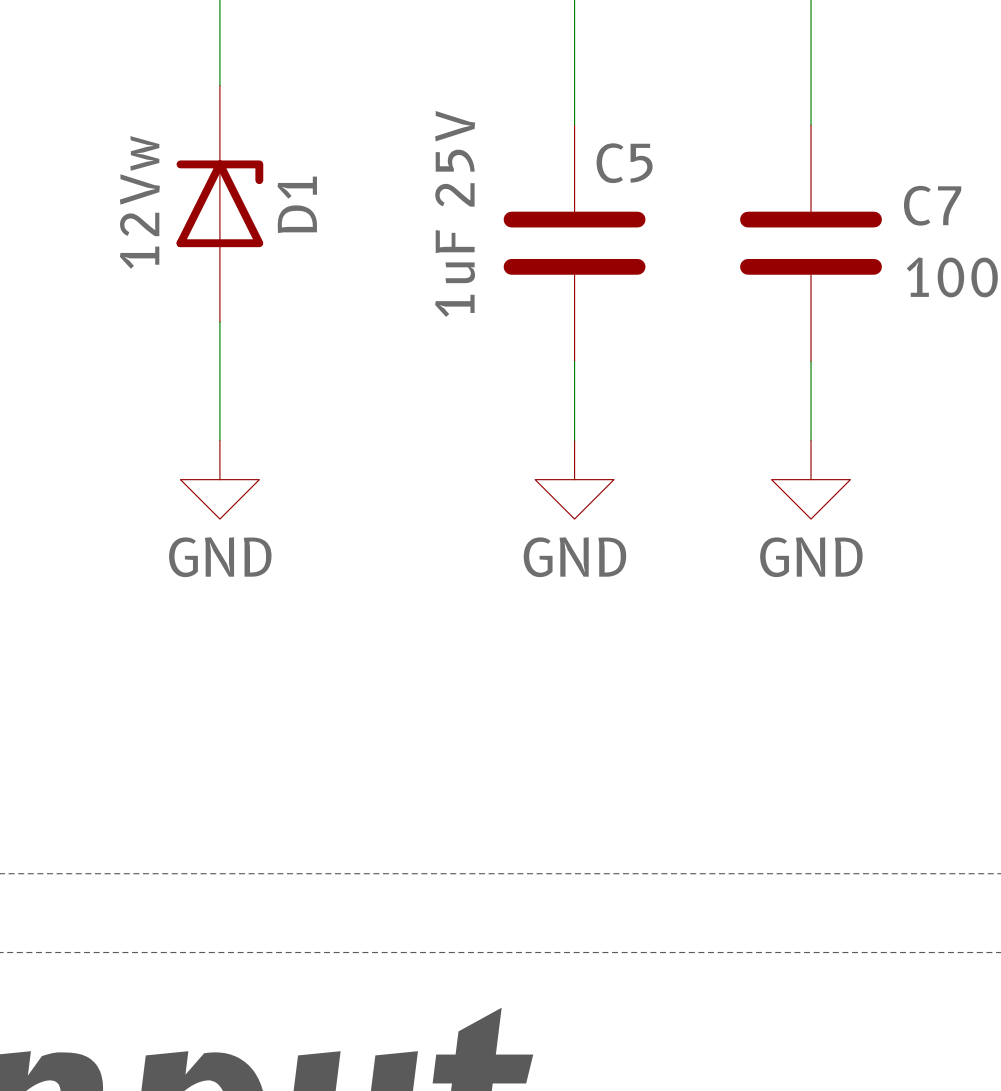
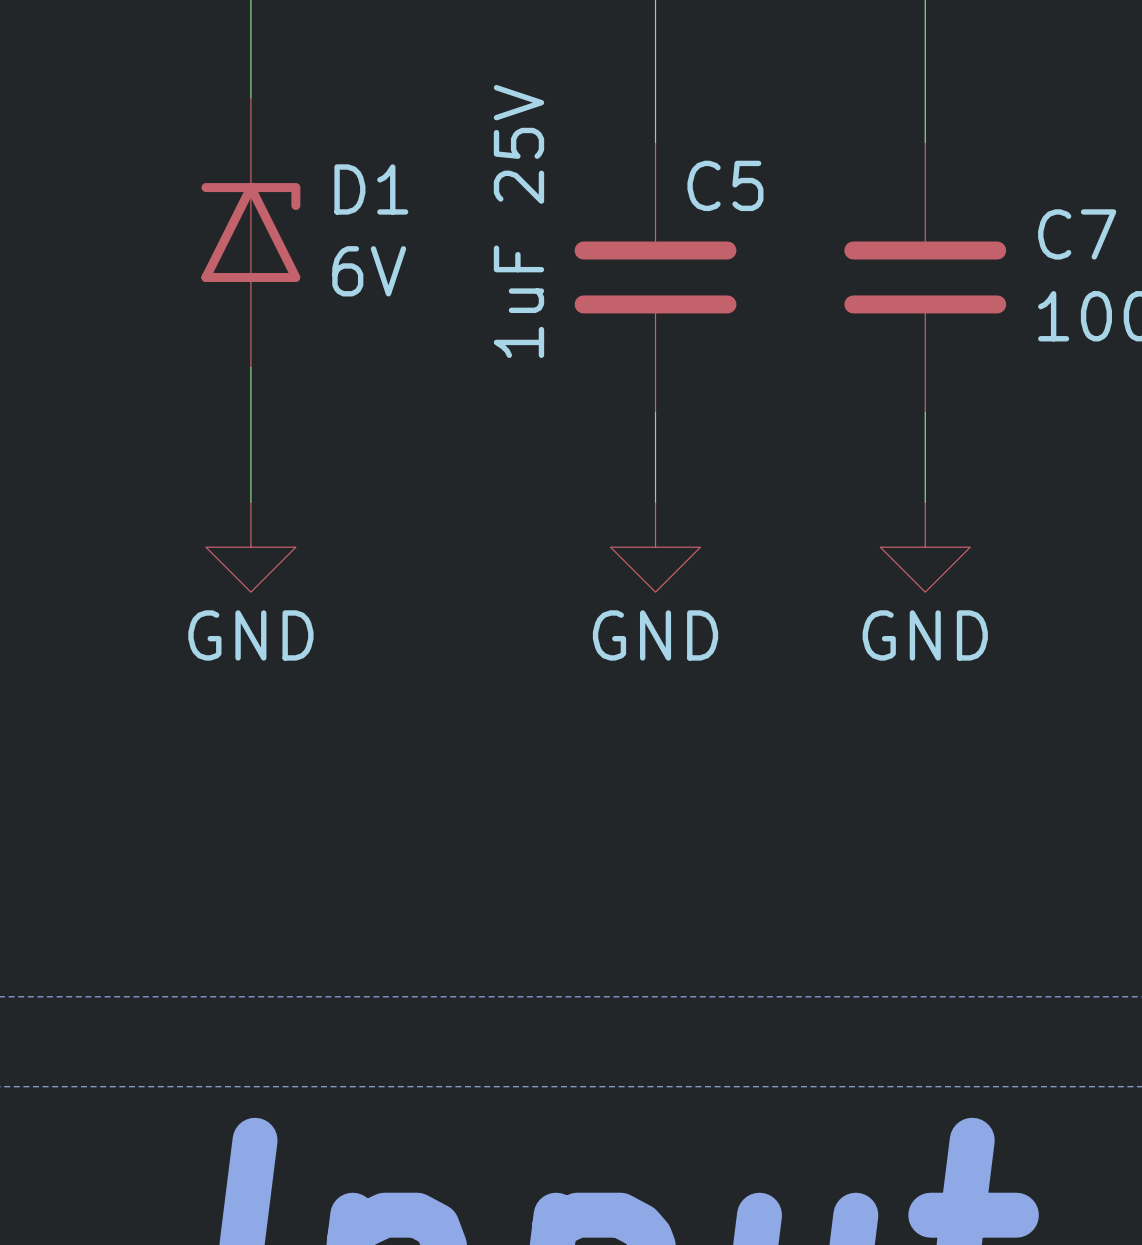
D1 value: 12Vw (139, 202) -> 6V (369, 271)
D1 name rotation: 0° (297, 204) -> 90° clockwise (371, 189)

